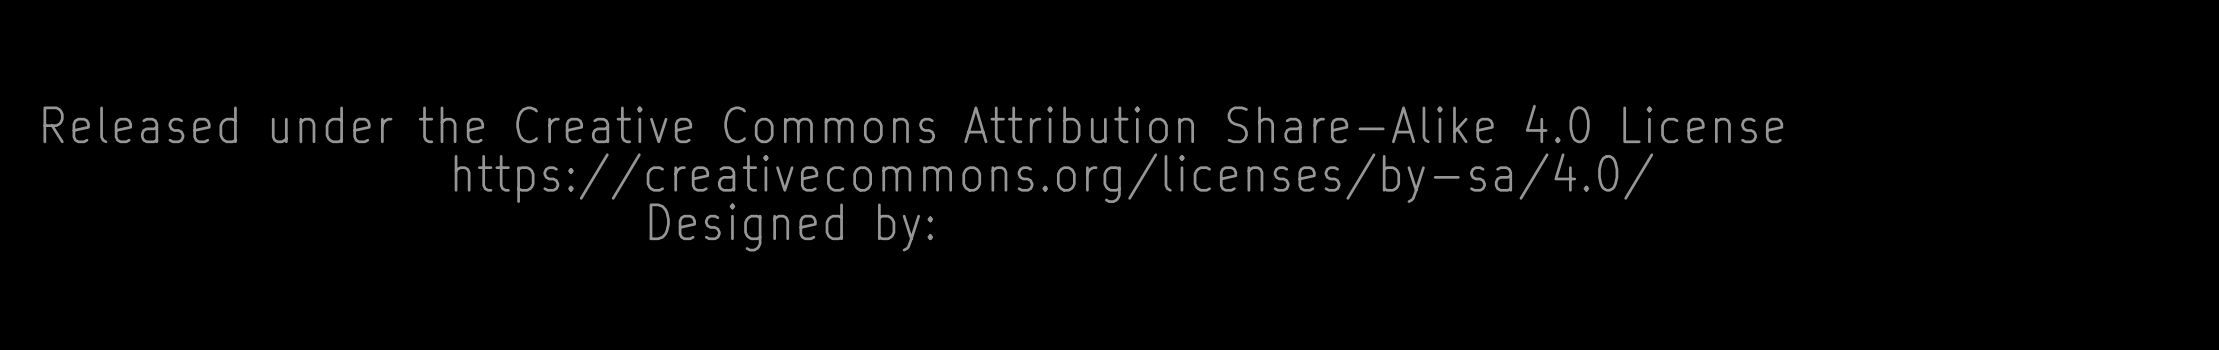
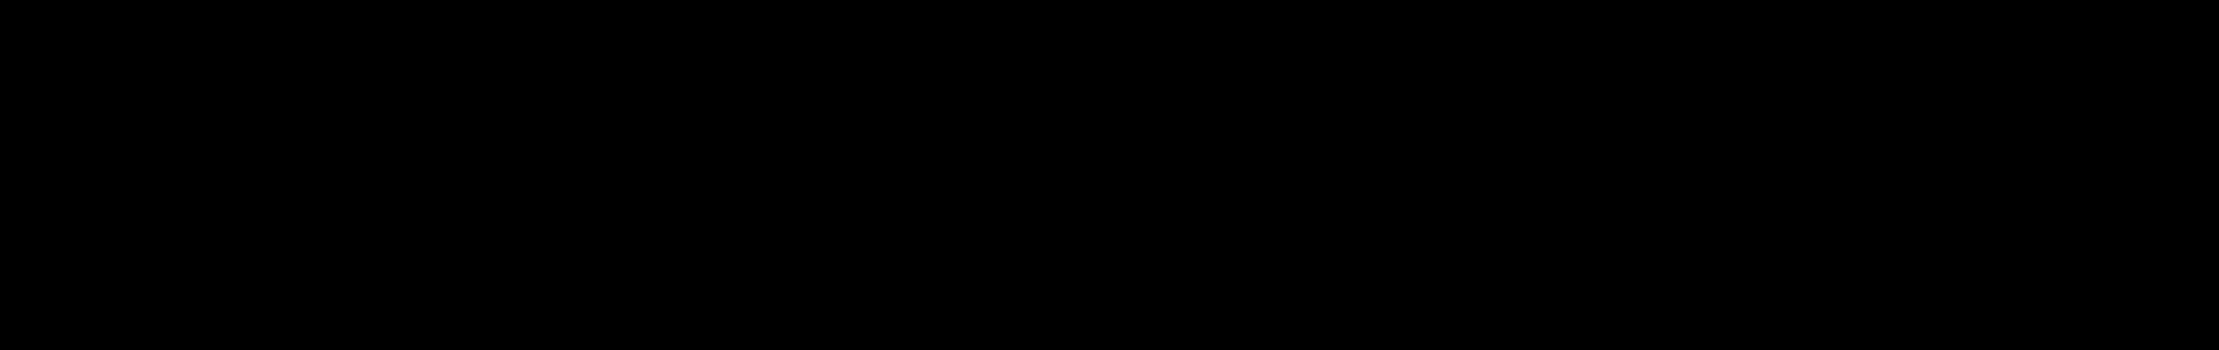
drawing: [43, 104, 1784, 252] -> none

